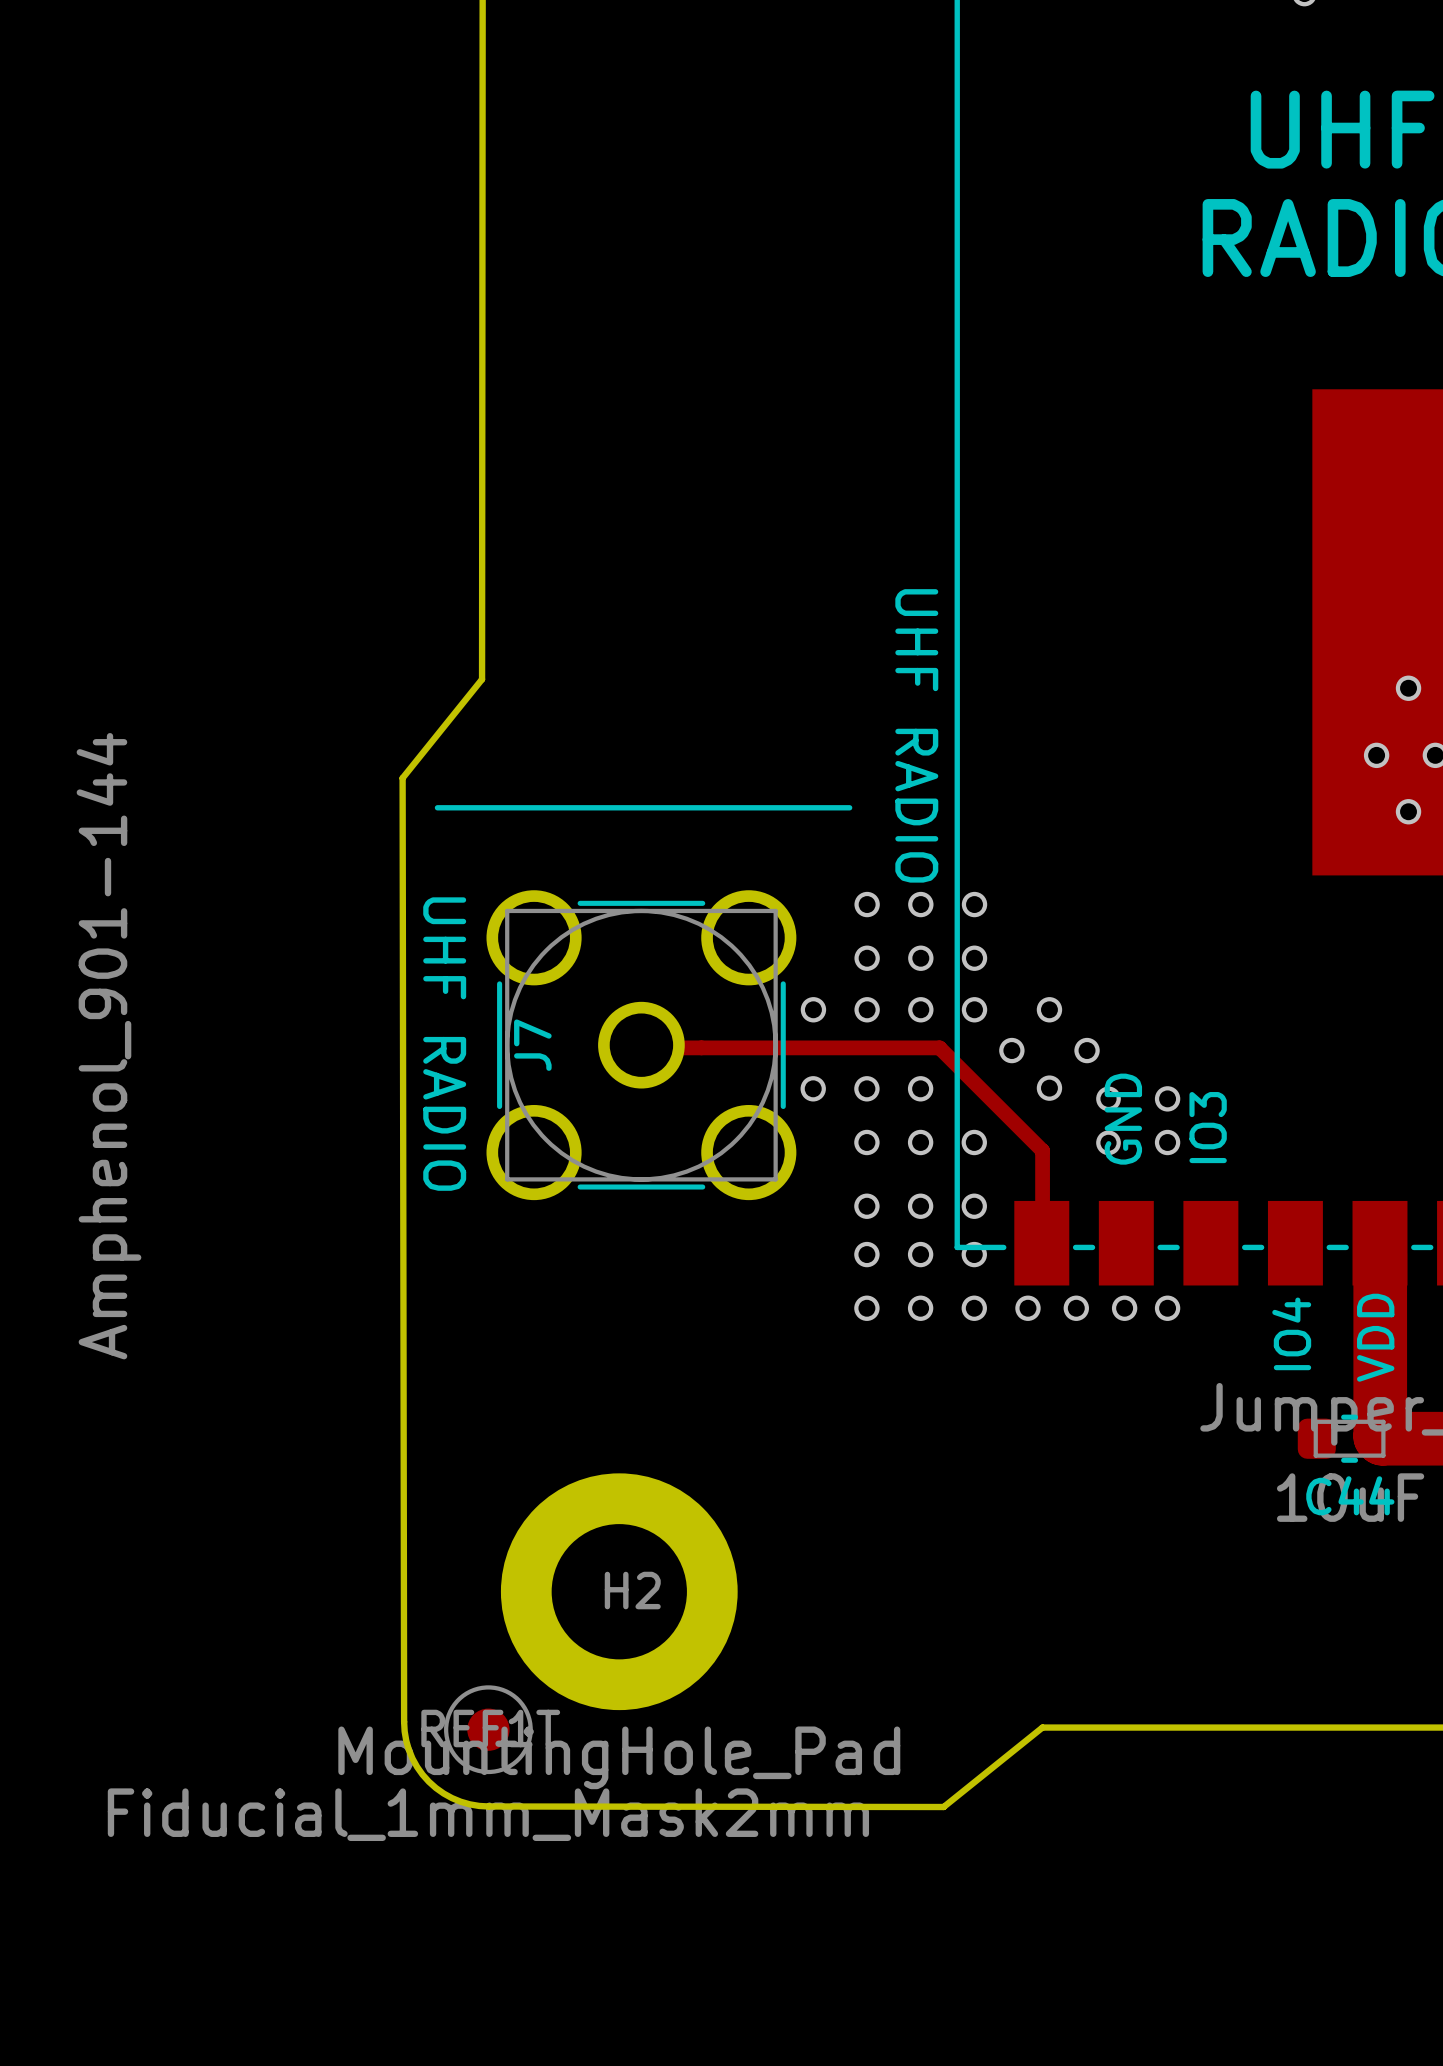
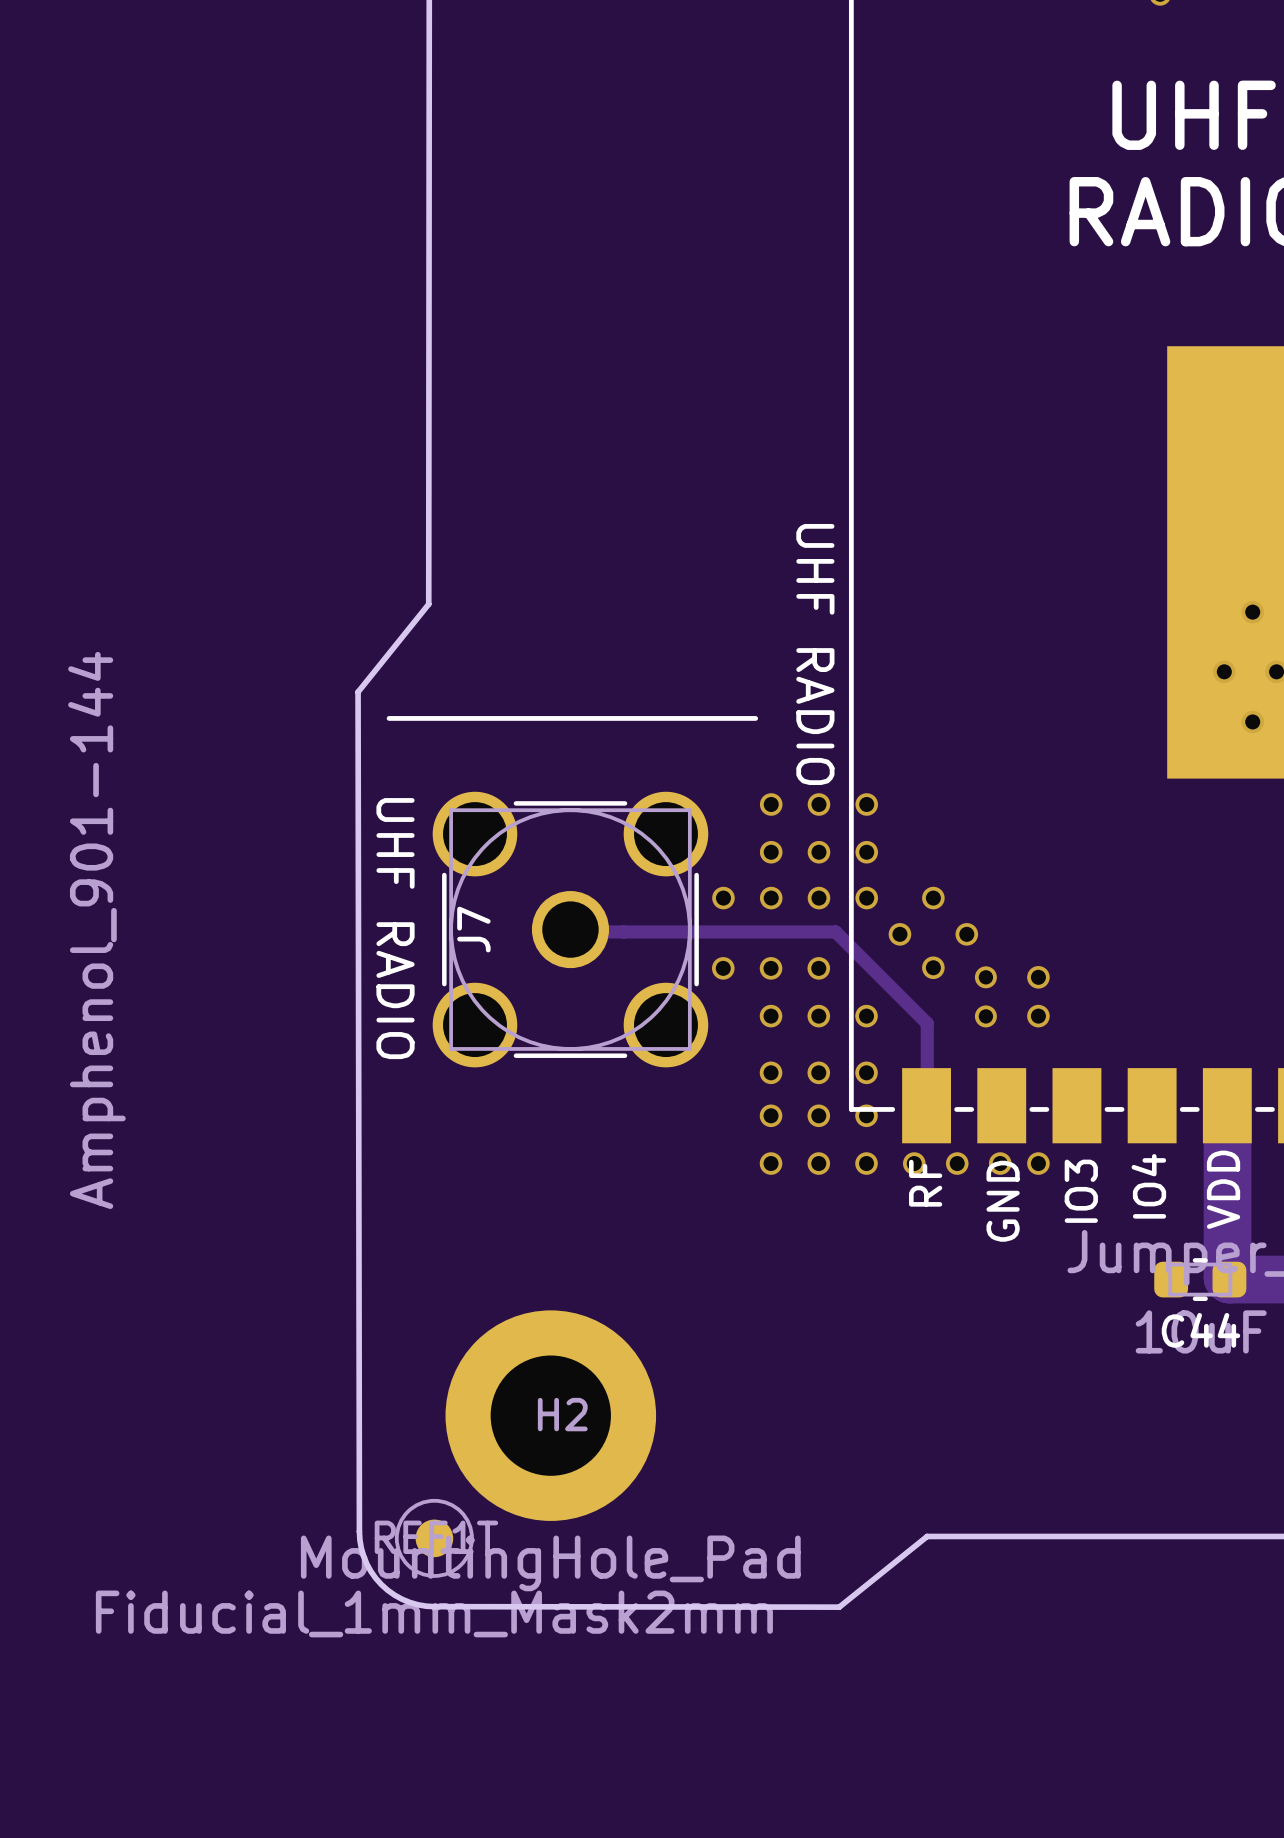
text position: GND (1123, 1119) -> GND (1003, 1201)
text position: IO3 (1208, 1127) -> IO3 (1081, 1191)
text: none -> RF (925, 1183)

